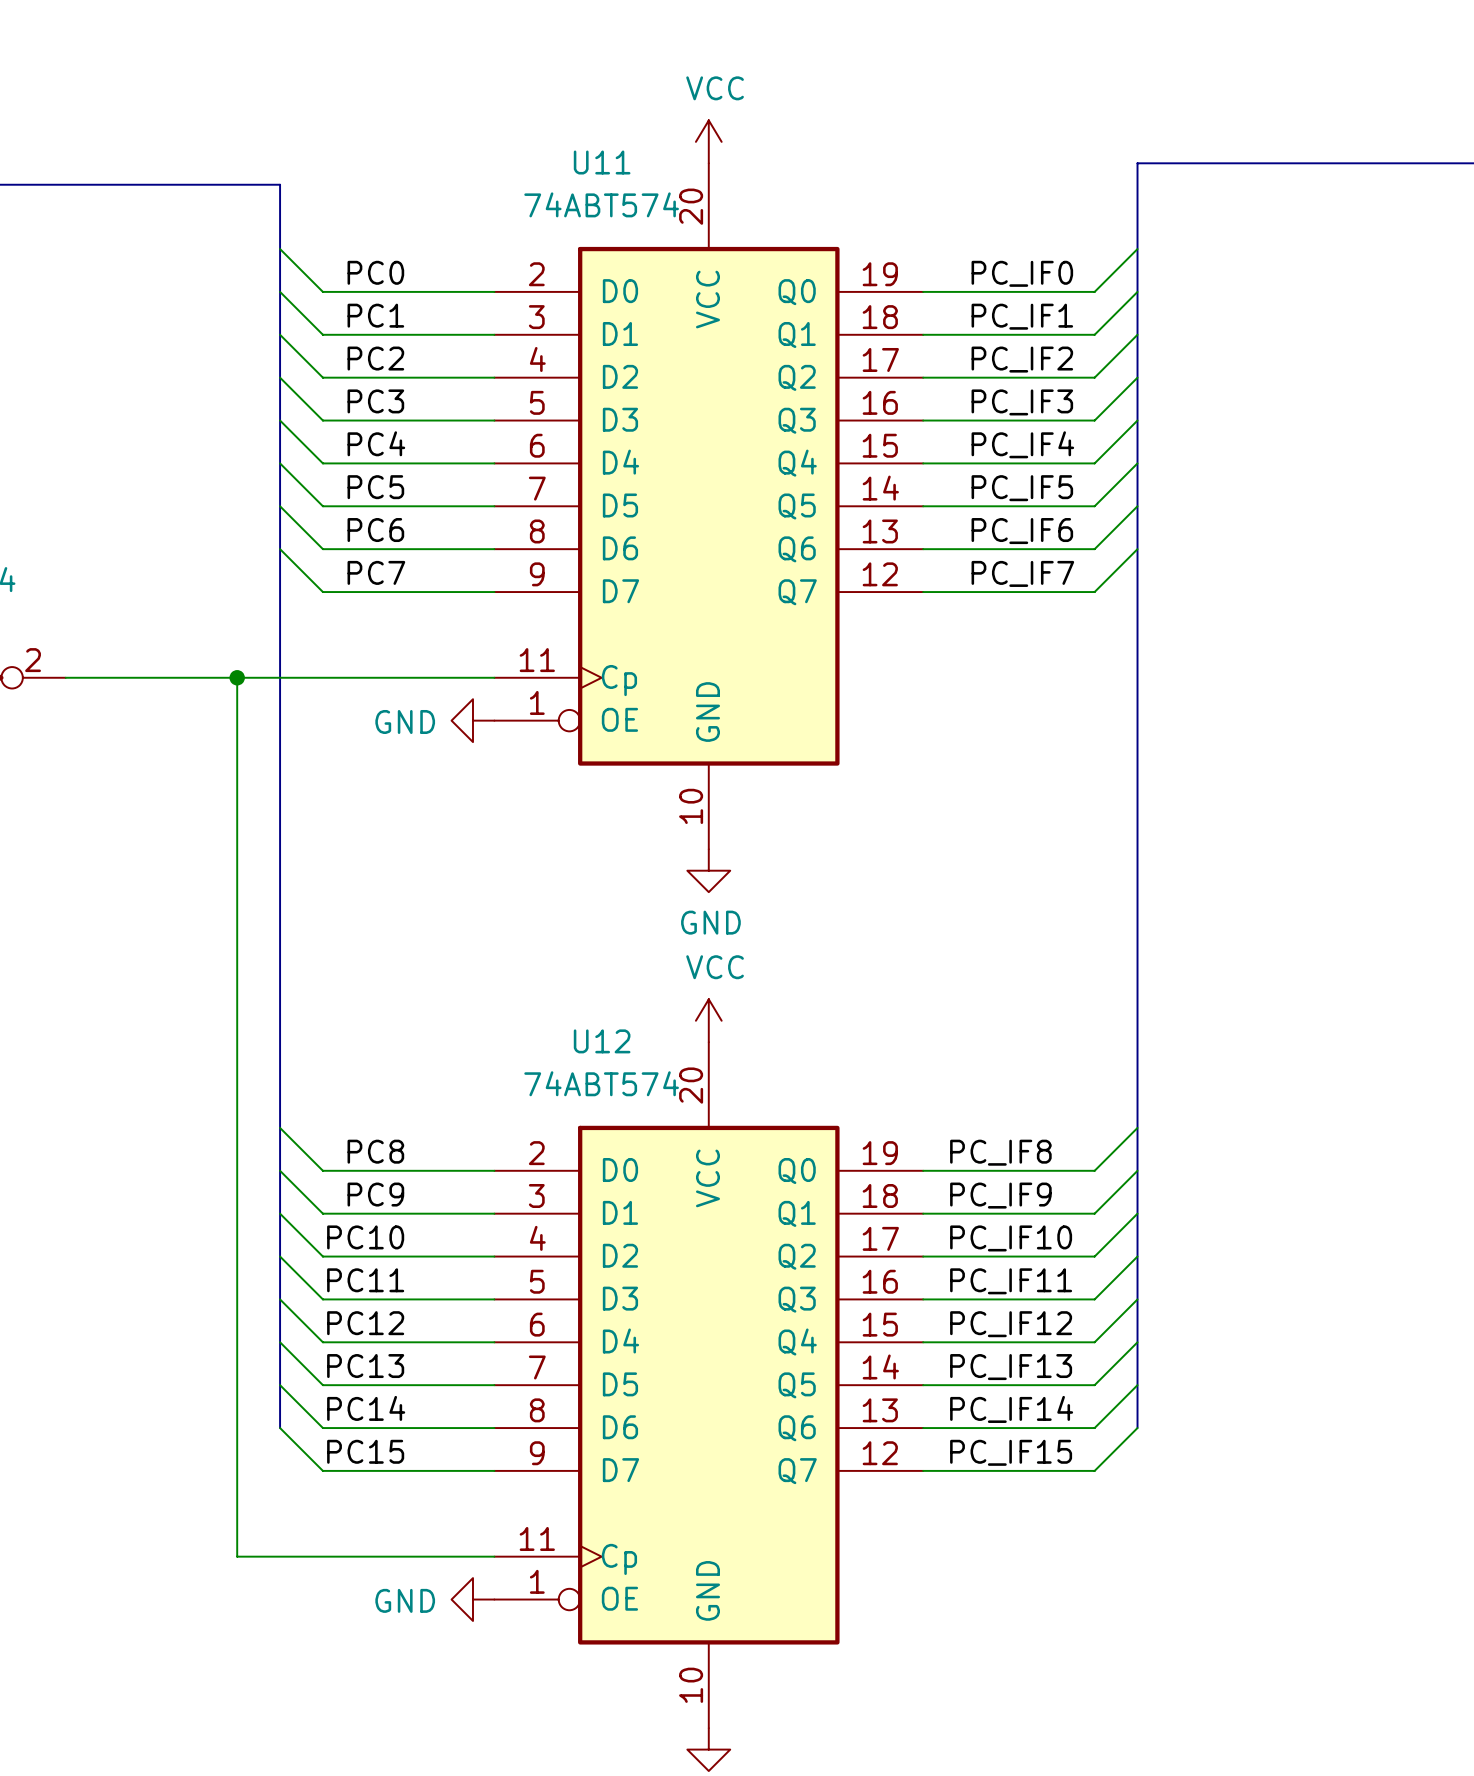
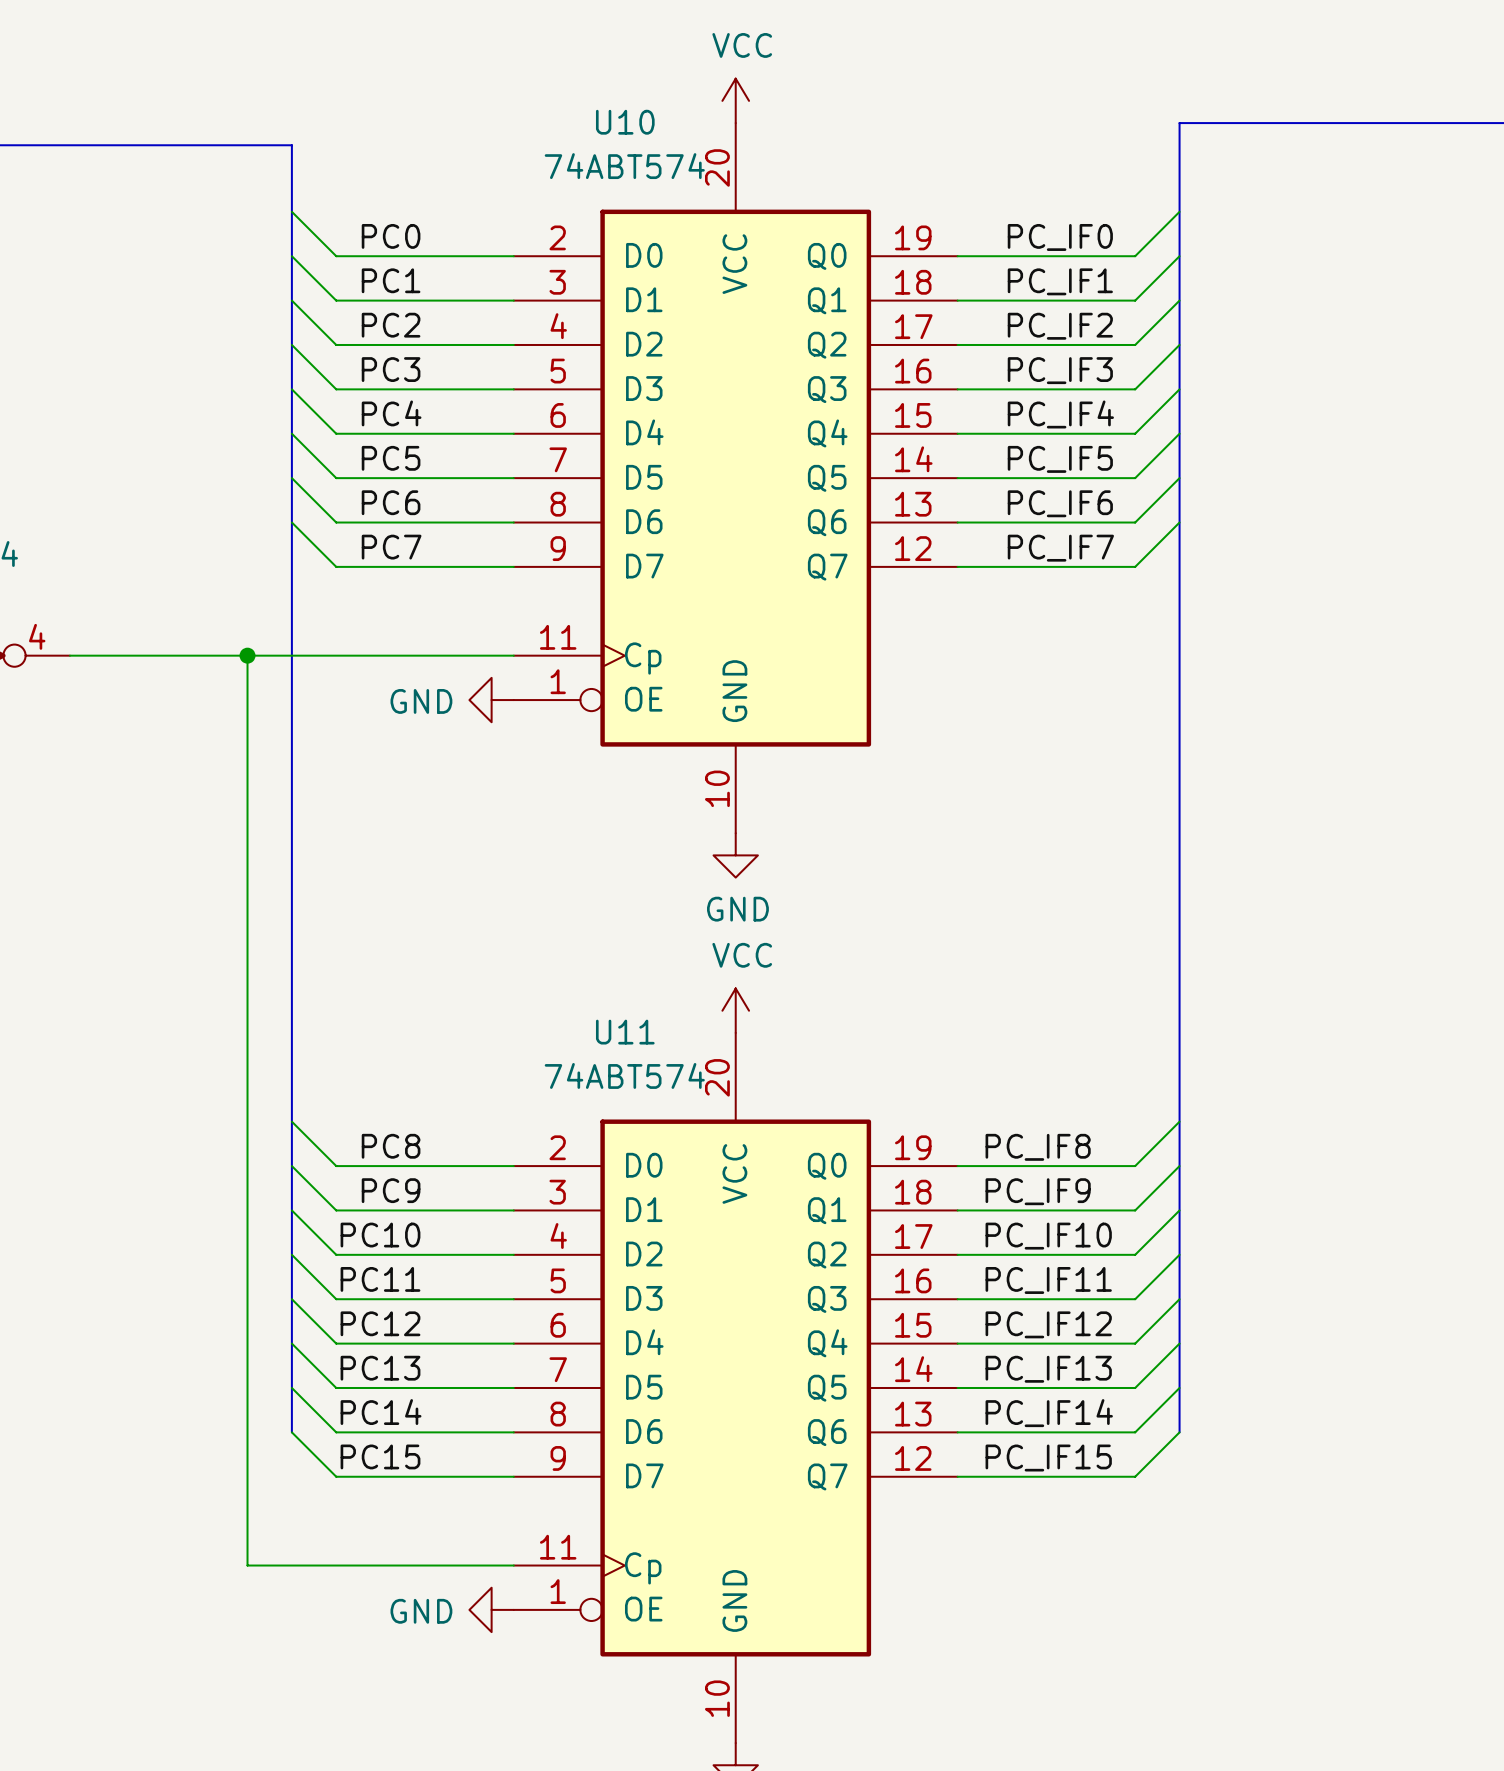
U11 name: U11 (602, 162) -> U10 (625, 122)
part pin number: 2 (33, 660) -> 4 (37, 636)
U12 name: U12 (602, 1041) -> U11 (625, 1032)

